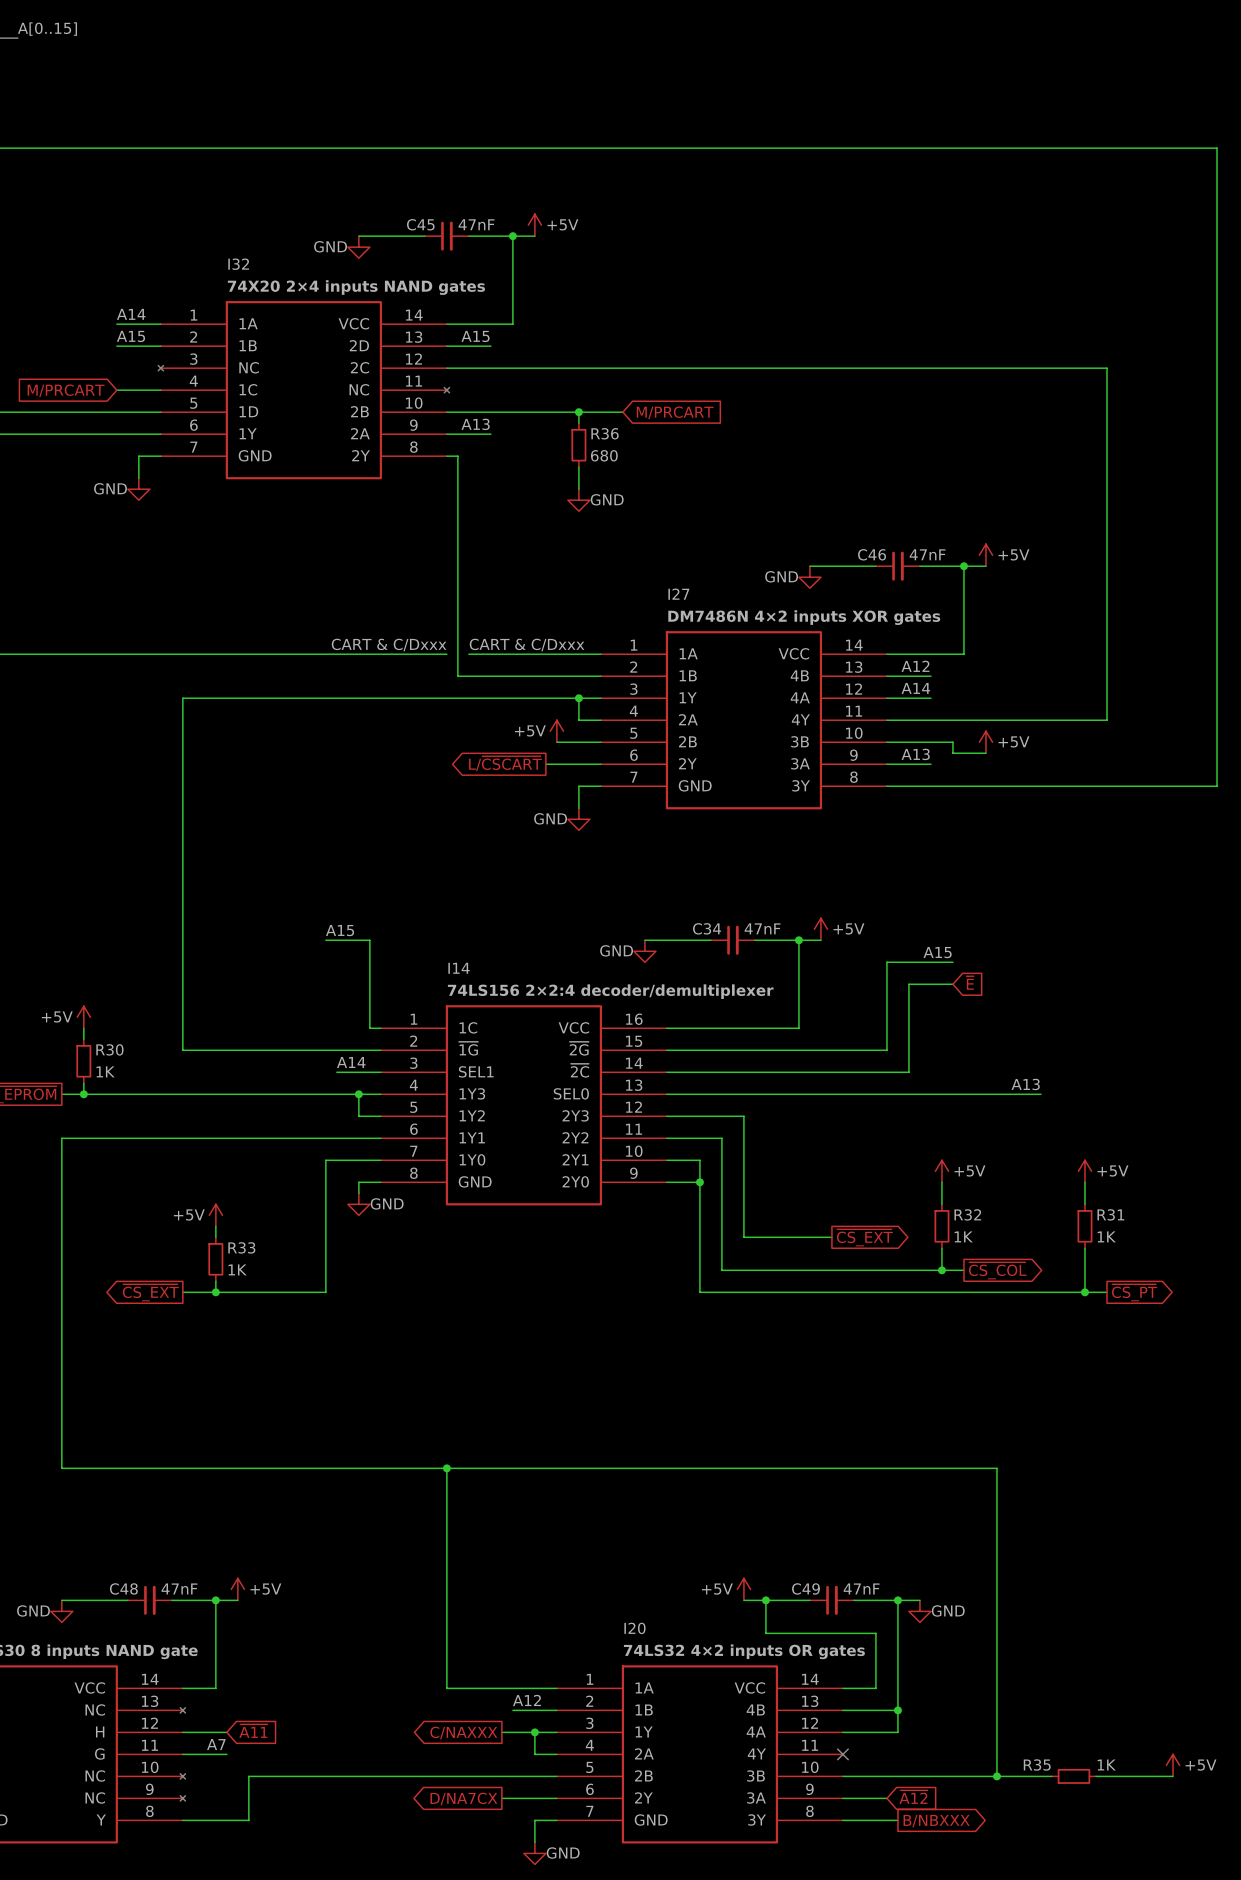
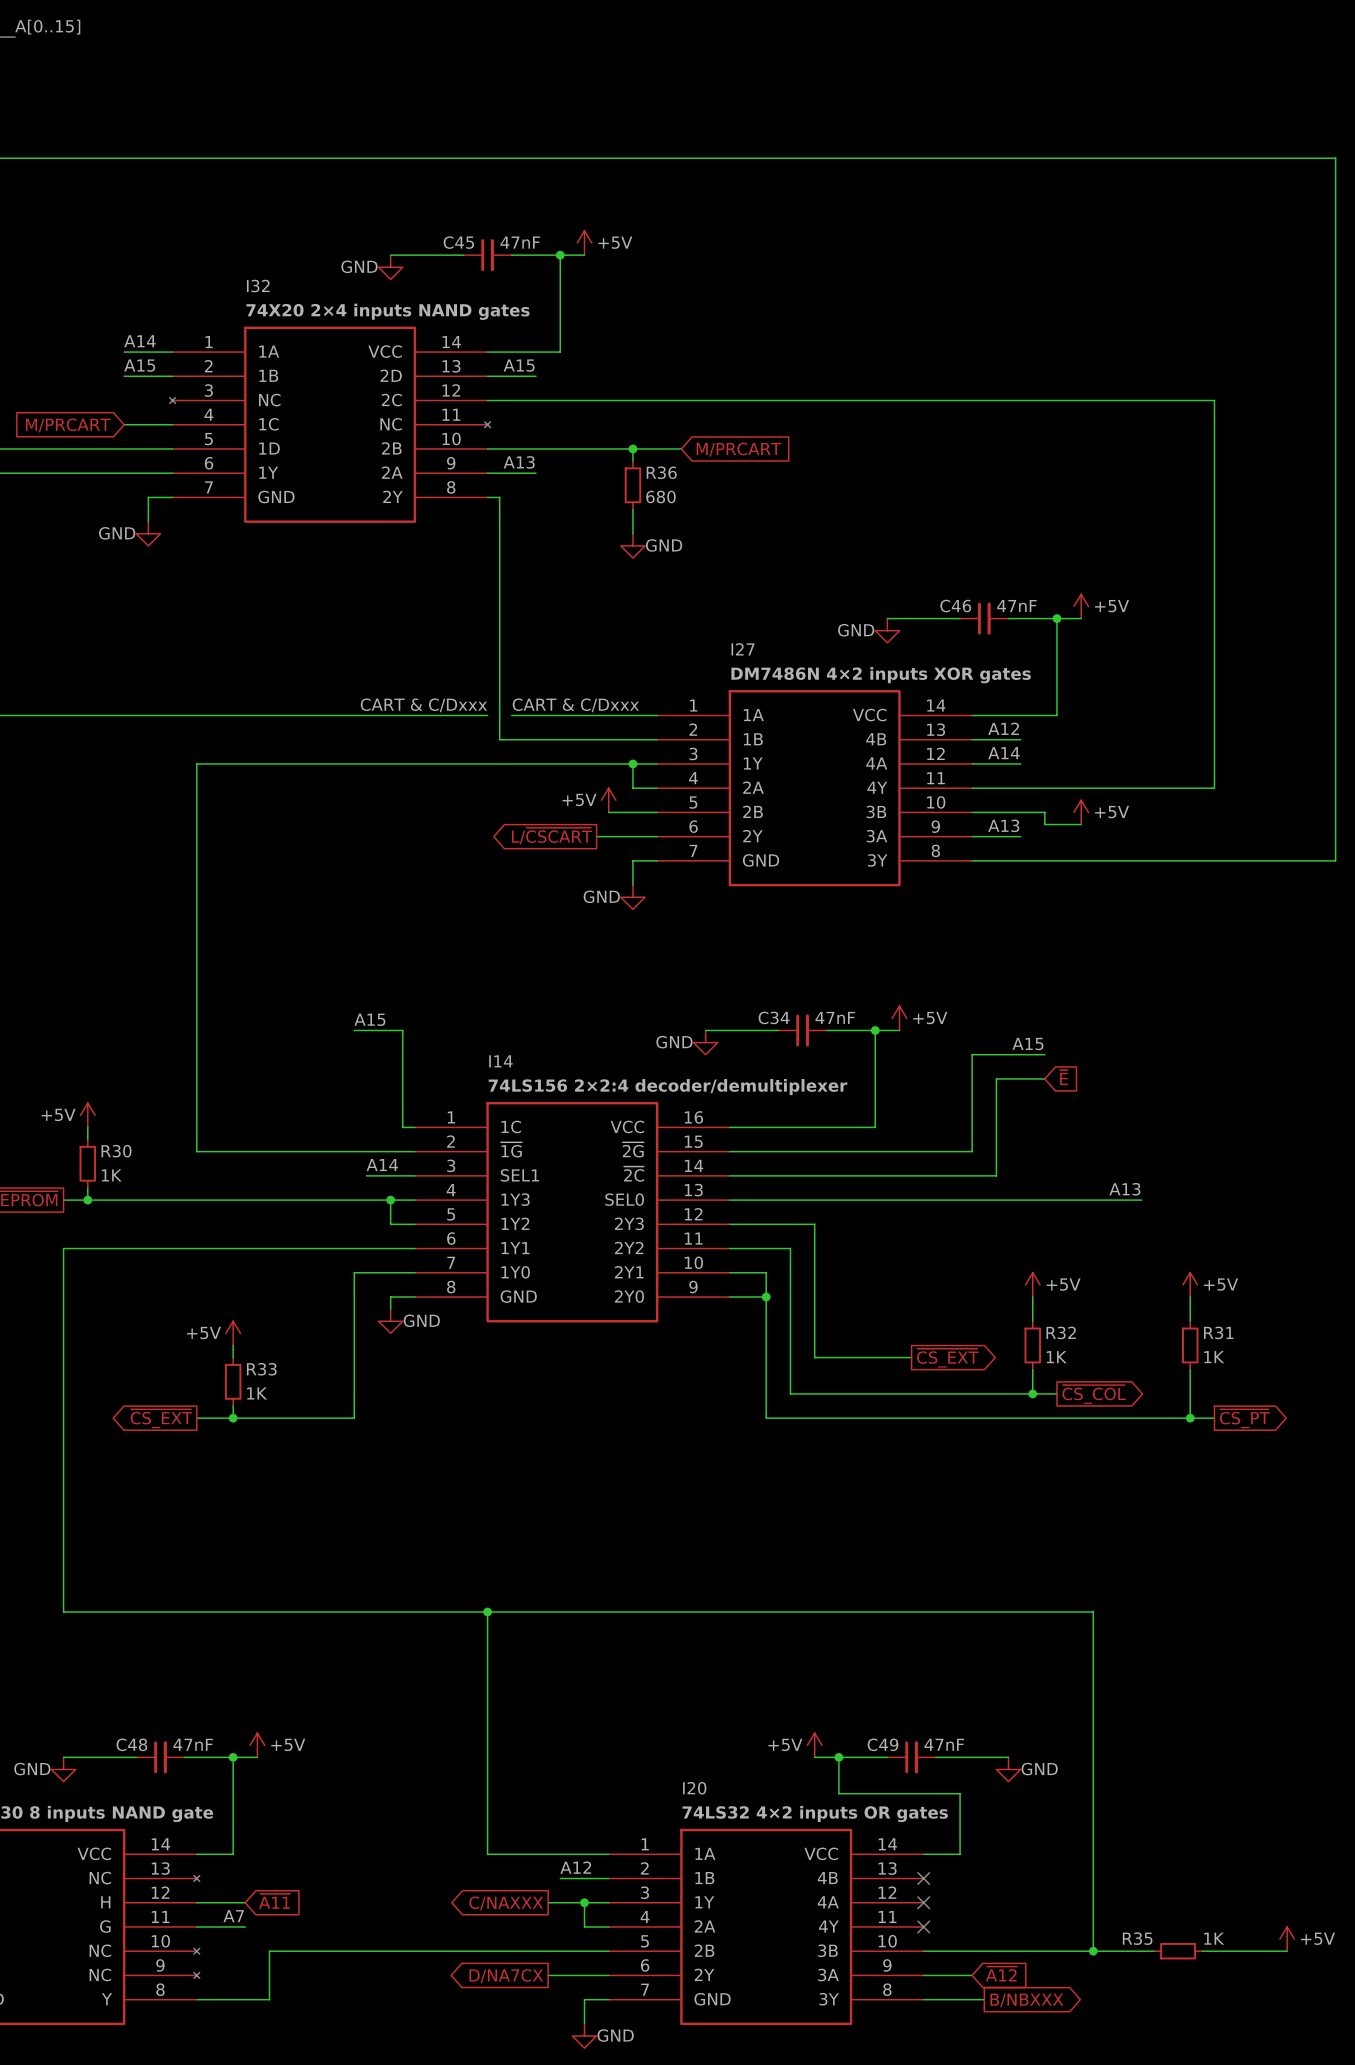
wire: (897, 1600) (897, 1732) (842, 1732) -> none
junction: (897, 1600) -> none
wire: (842, 1710) (897, 1710) -> none
no-connect mark: none -> (923, 1878)
junction: (897, 1710) -> none
no-connect mark: none -> (923, 1902)

